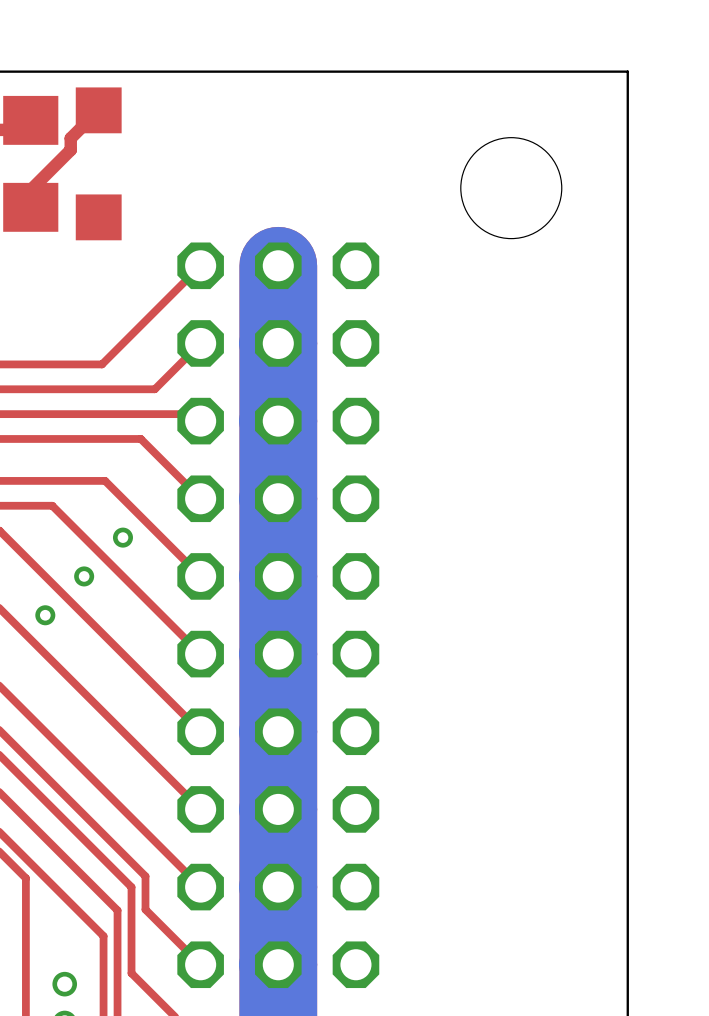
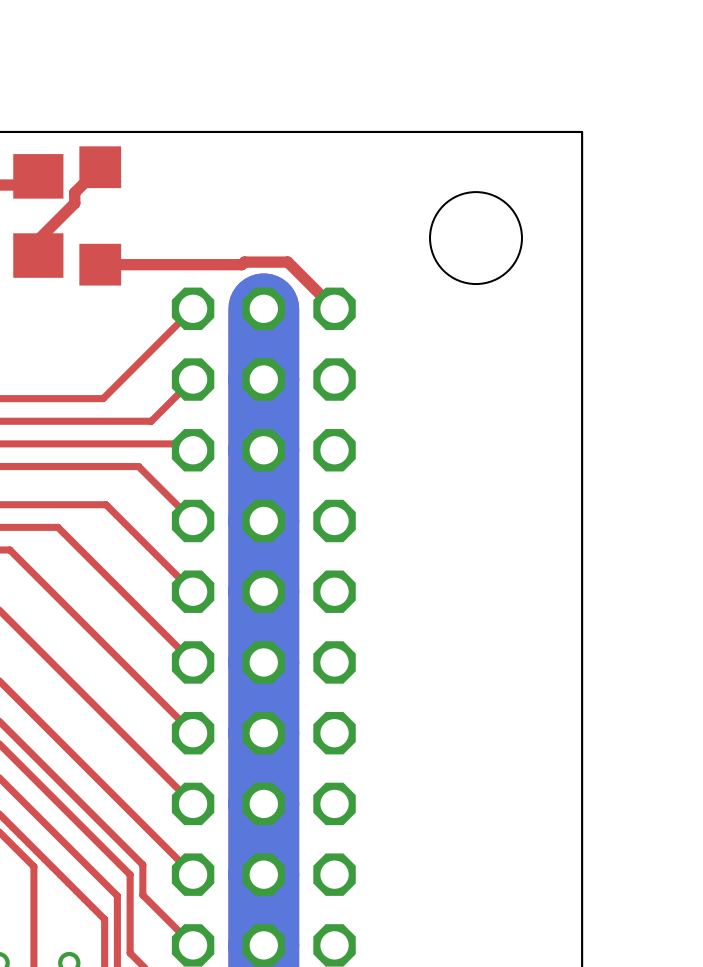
top track: none -> (100, 264) (241, 264) (244, 262) (287, 262) (334, 308)
via: (122, 537) -> none
via: (84, 576) -> none
via: (45, 615) -> none

